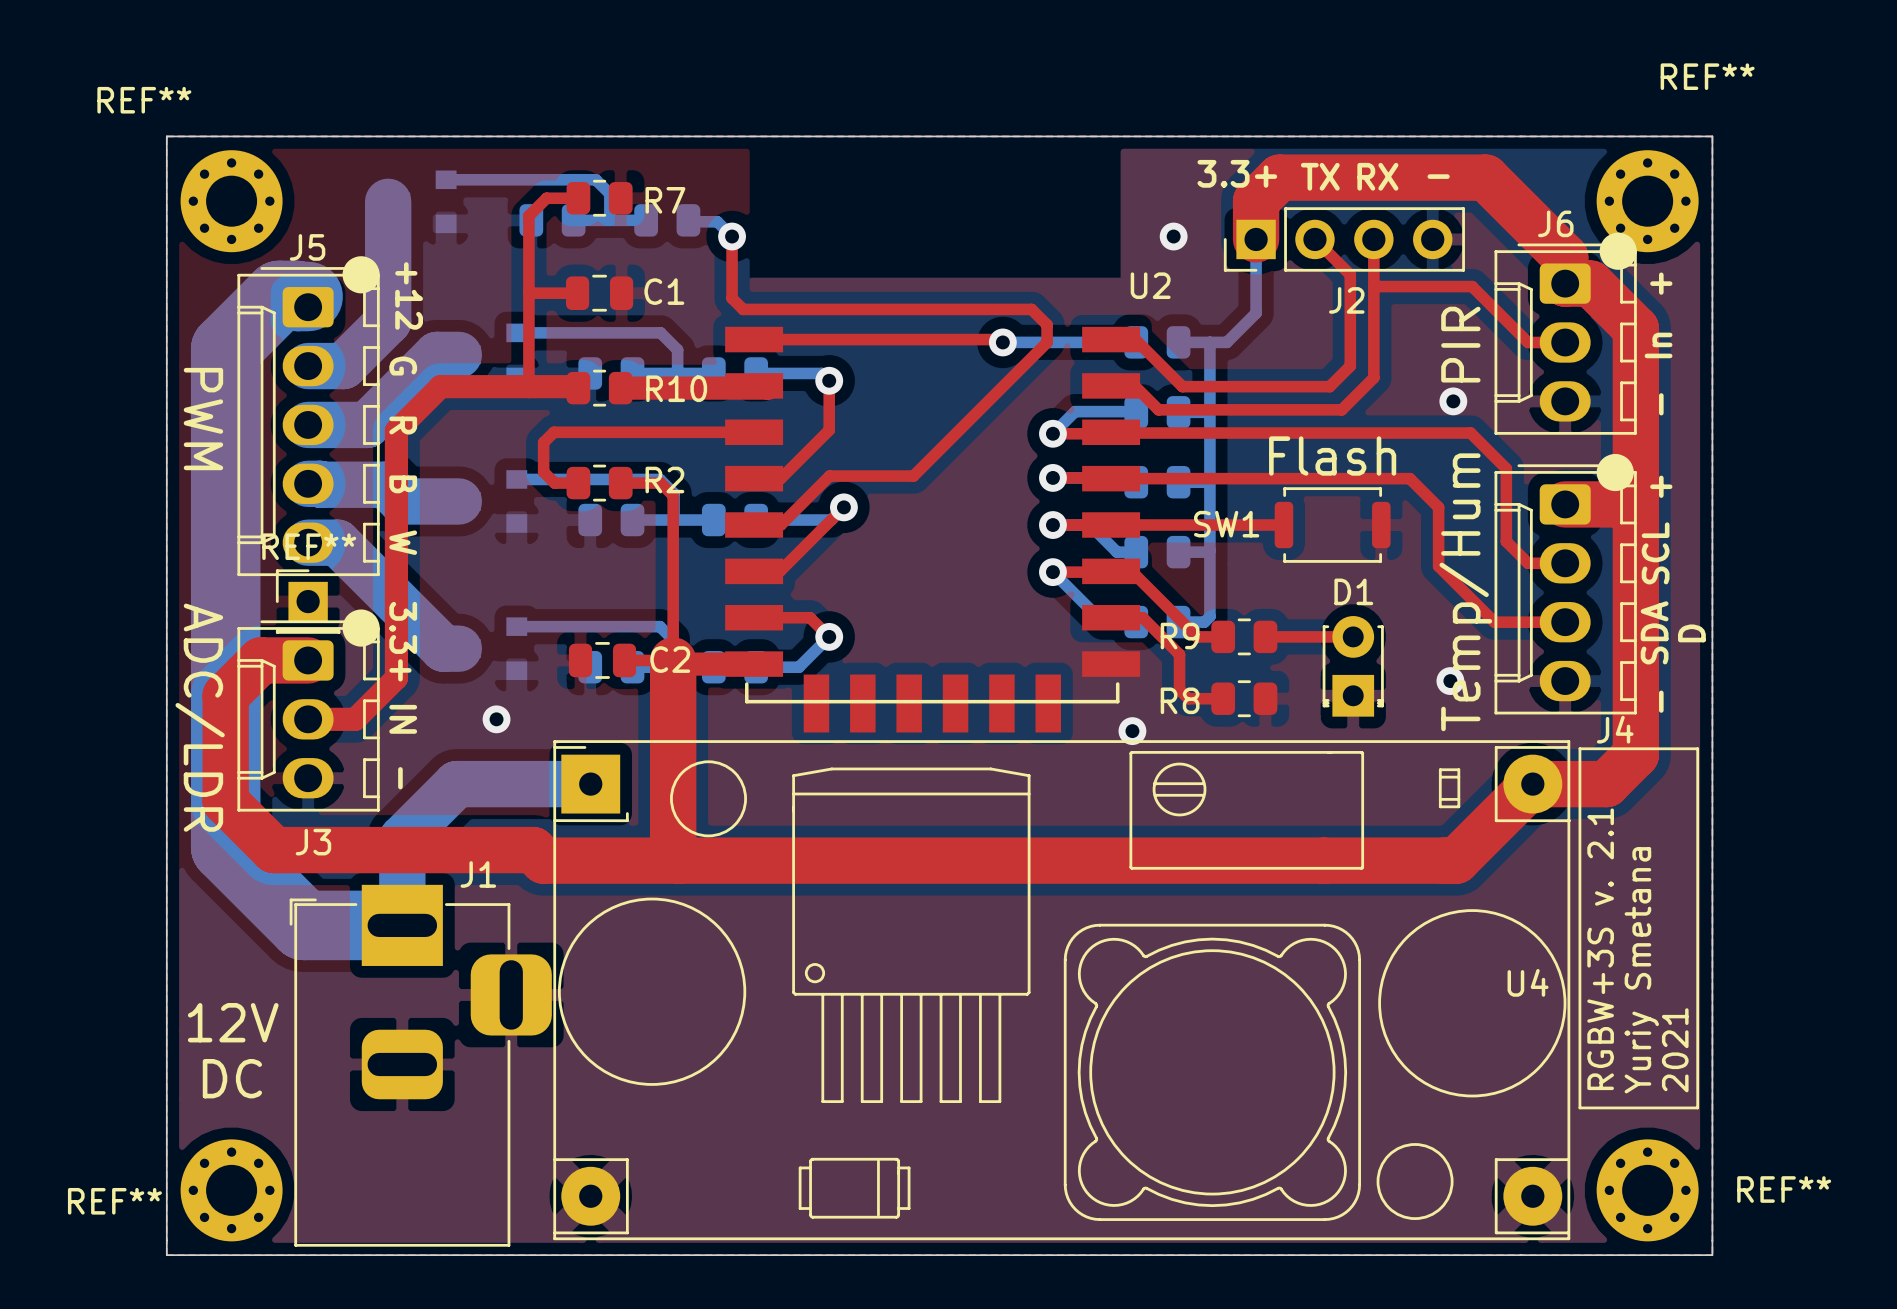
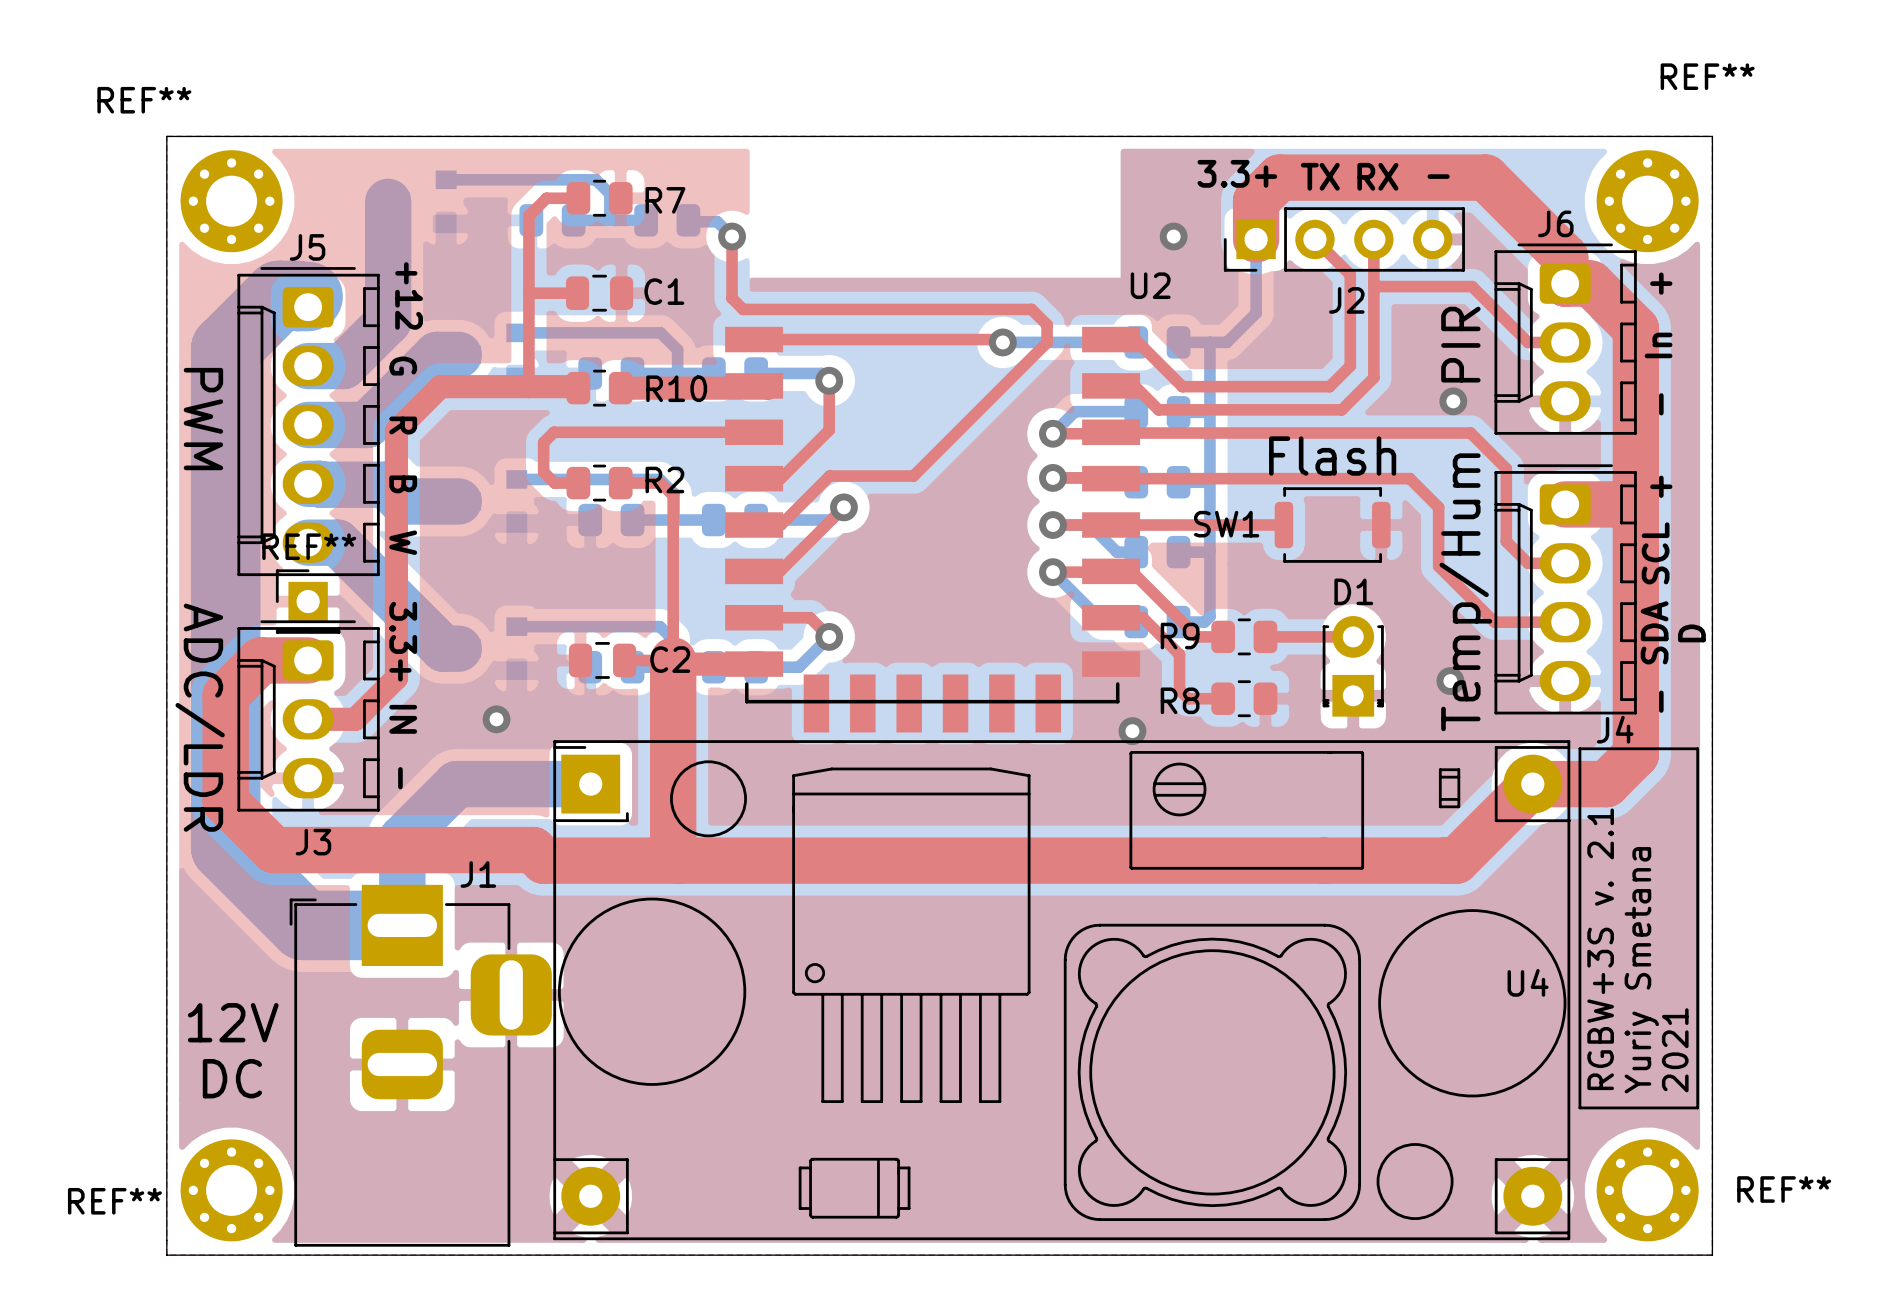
drawing: [1599, 232, 1637, 270] -> none
drawing: [342, 256, 380, 294] -> none
drawing: [1596, 453, 1634, 492] -> none
drawing: [342, 609, 380, 647] -> none

